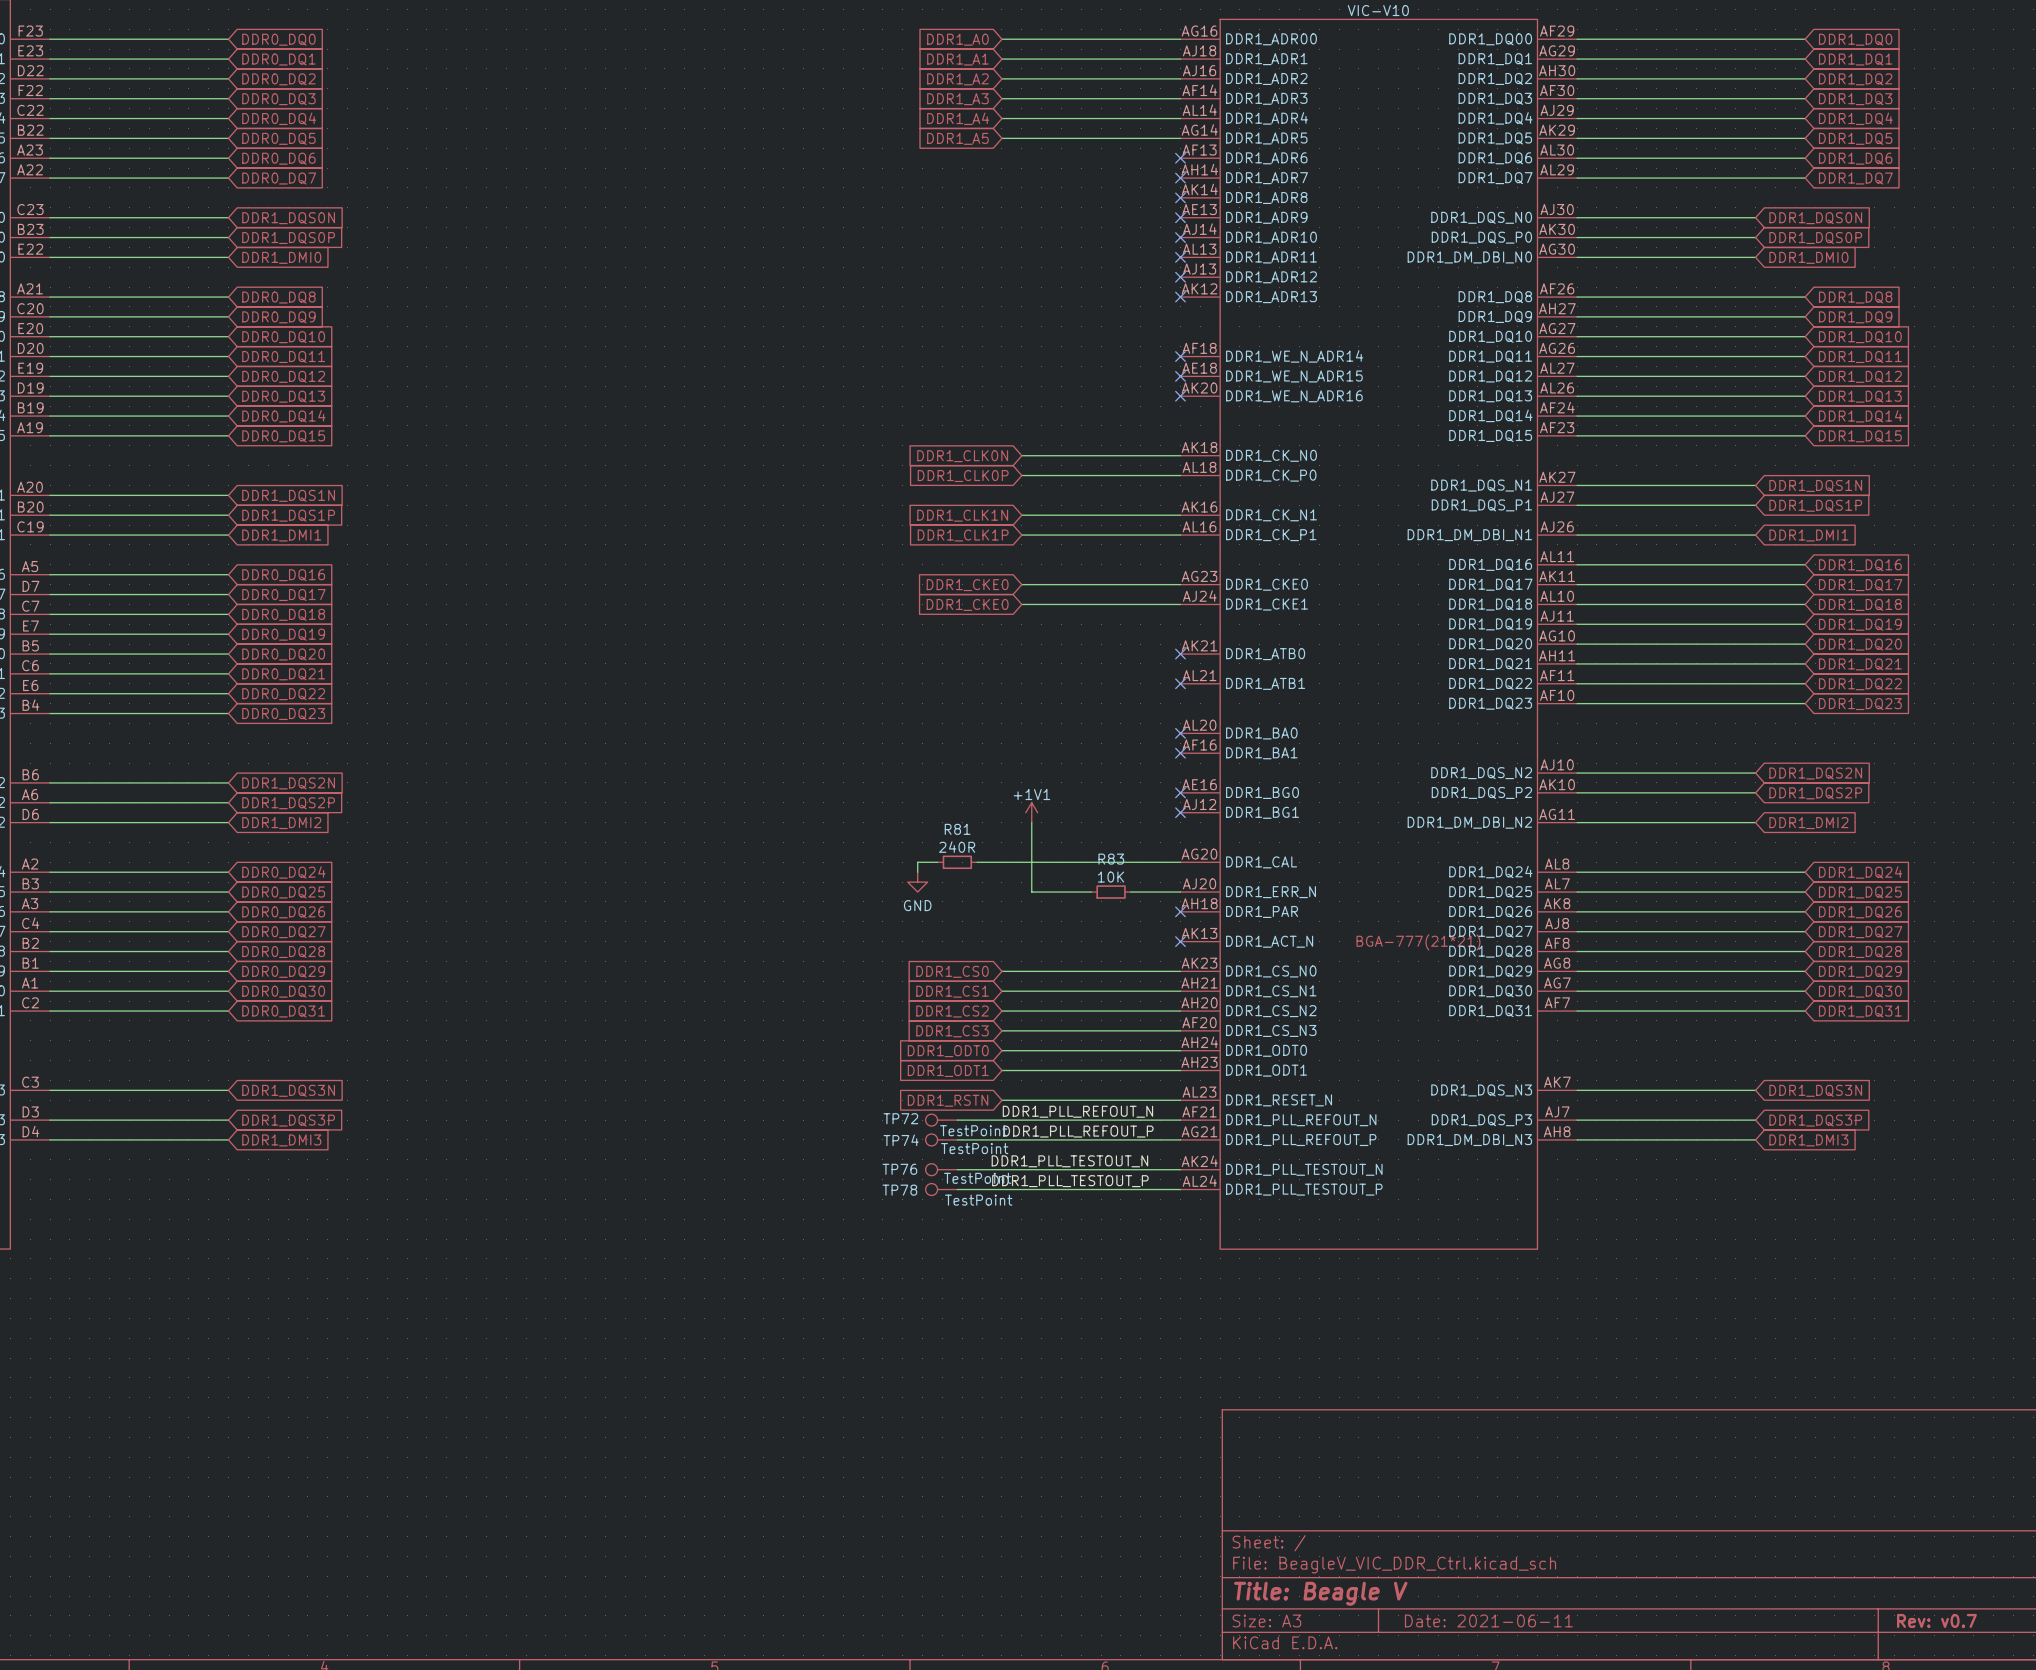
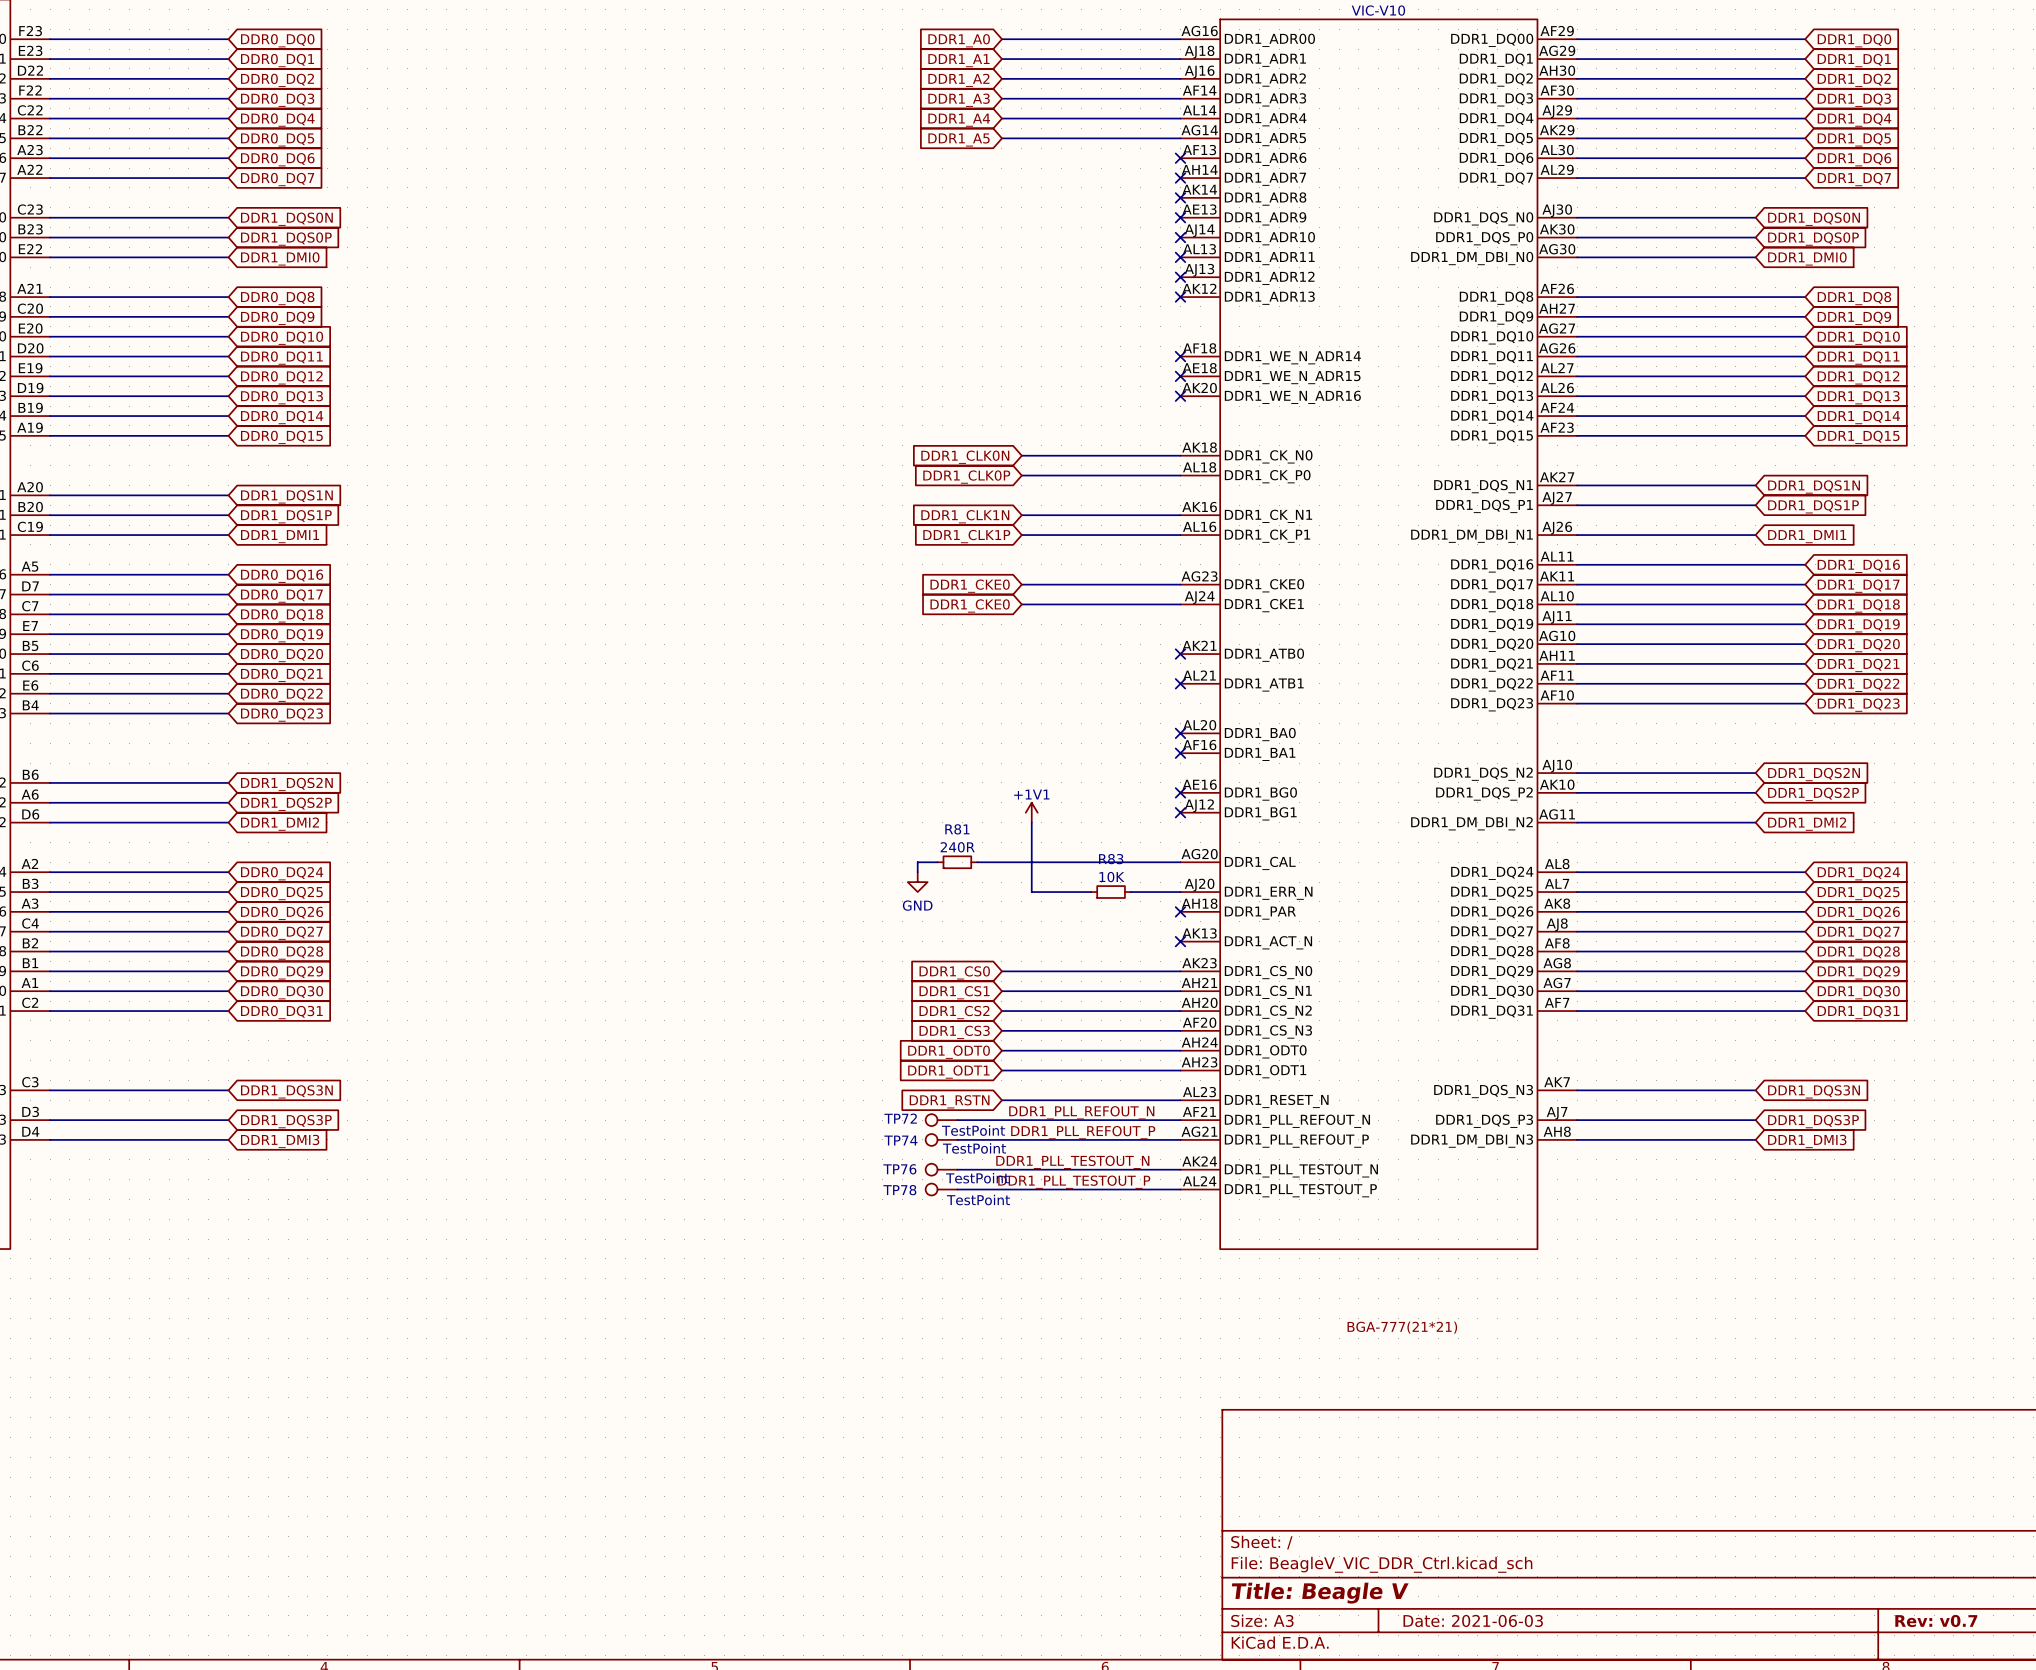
part text position: BGA-777(21*21) (1418, 942) -> BGA-777(21*21) (1402, 1327)
title block: Date: 2021-06-11 (1488, 1620) -> Date: 2021-06-03 (1473, 1620)

